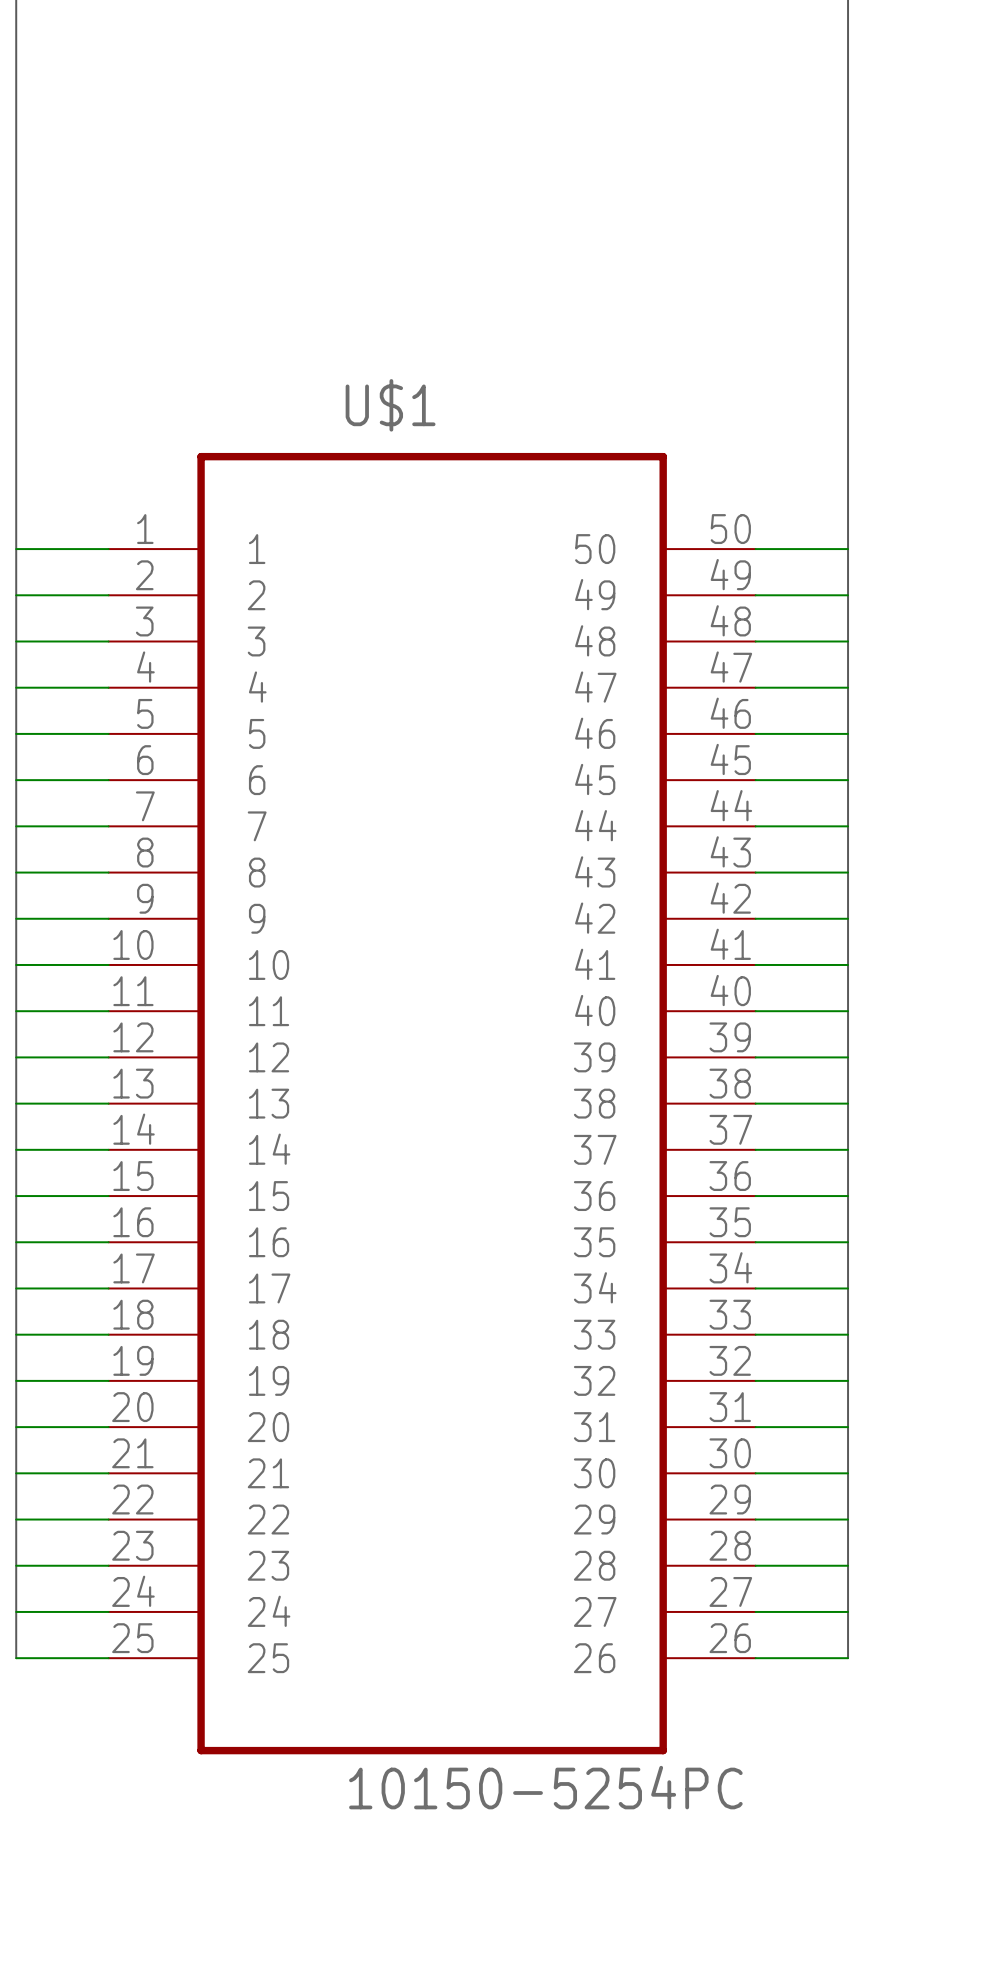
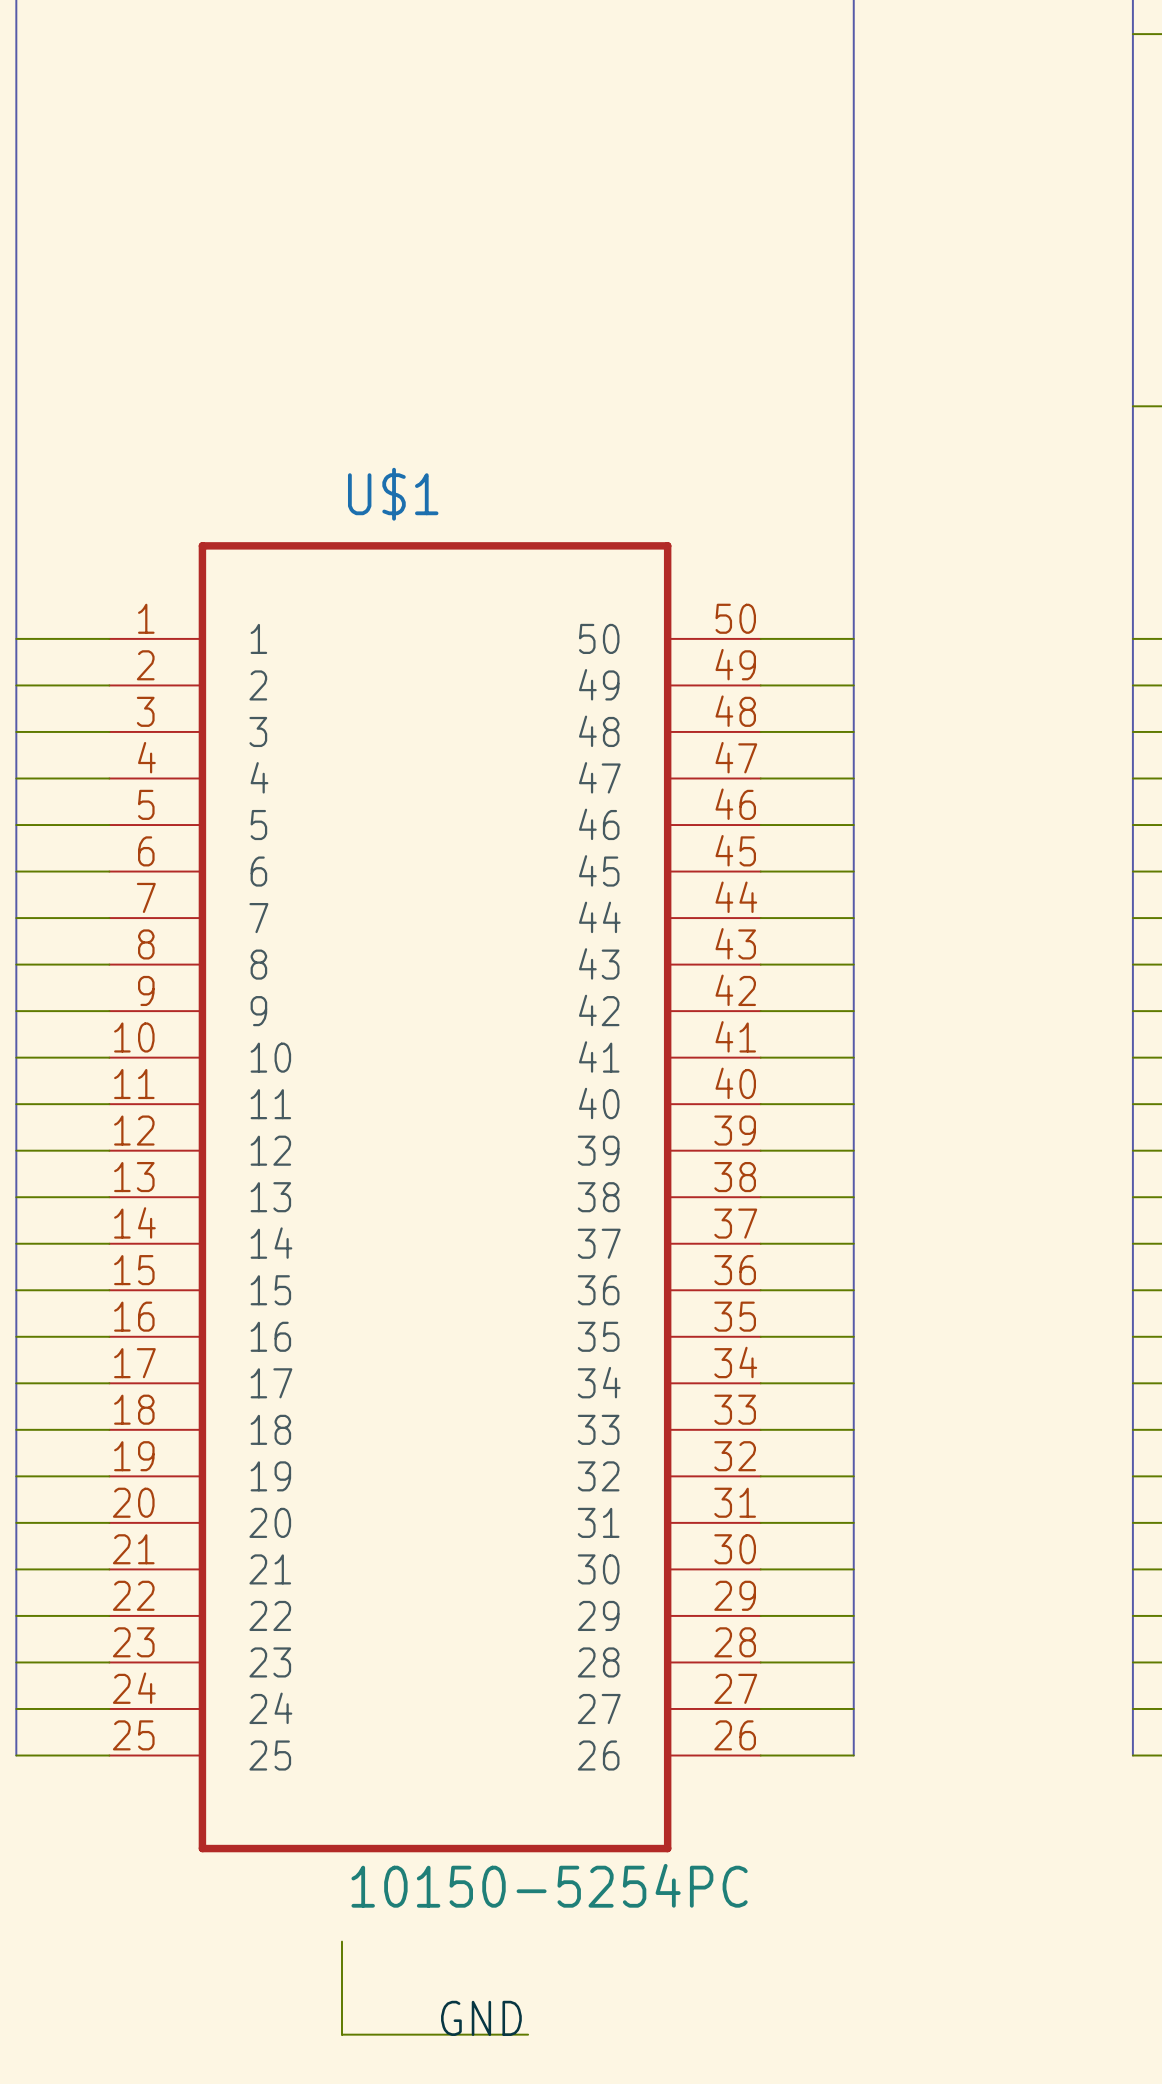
wire: none -> (341, 1941) (341, 2034) (528, 2034)
label: none -> GND (481, 2018)

